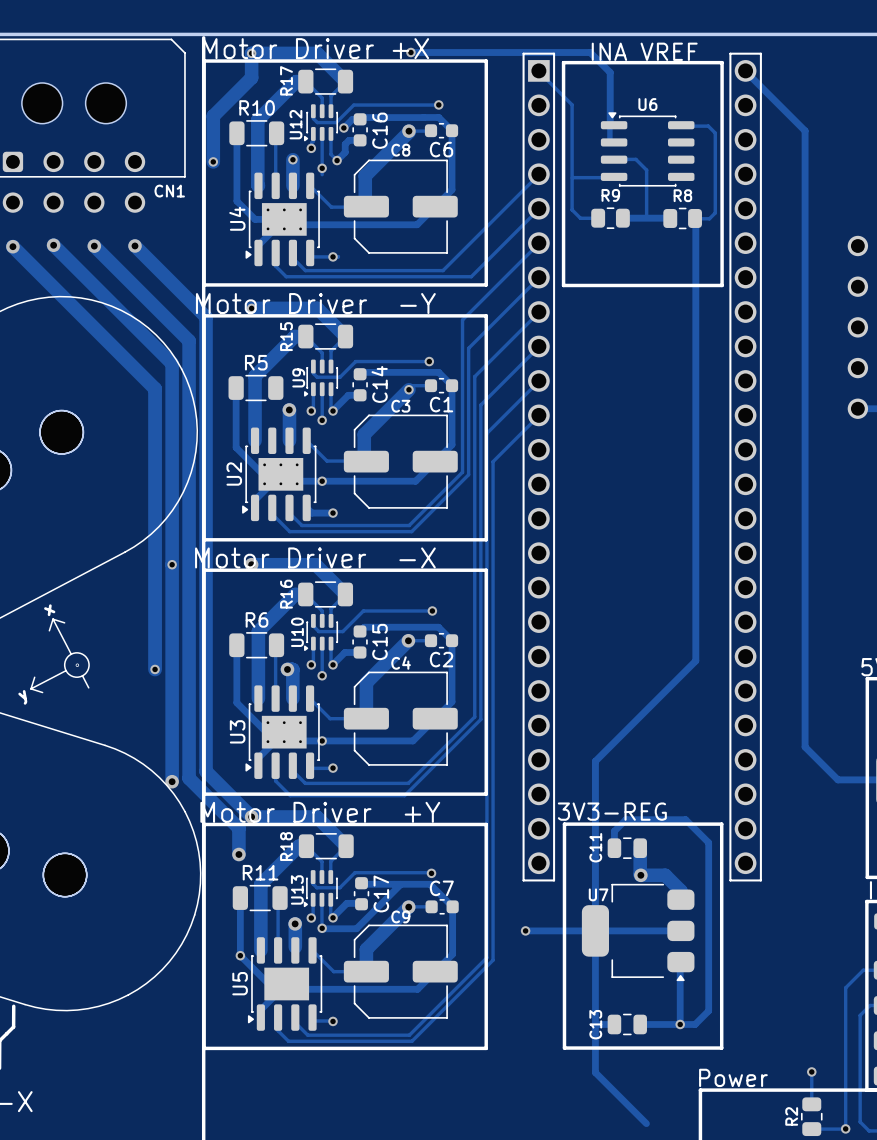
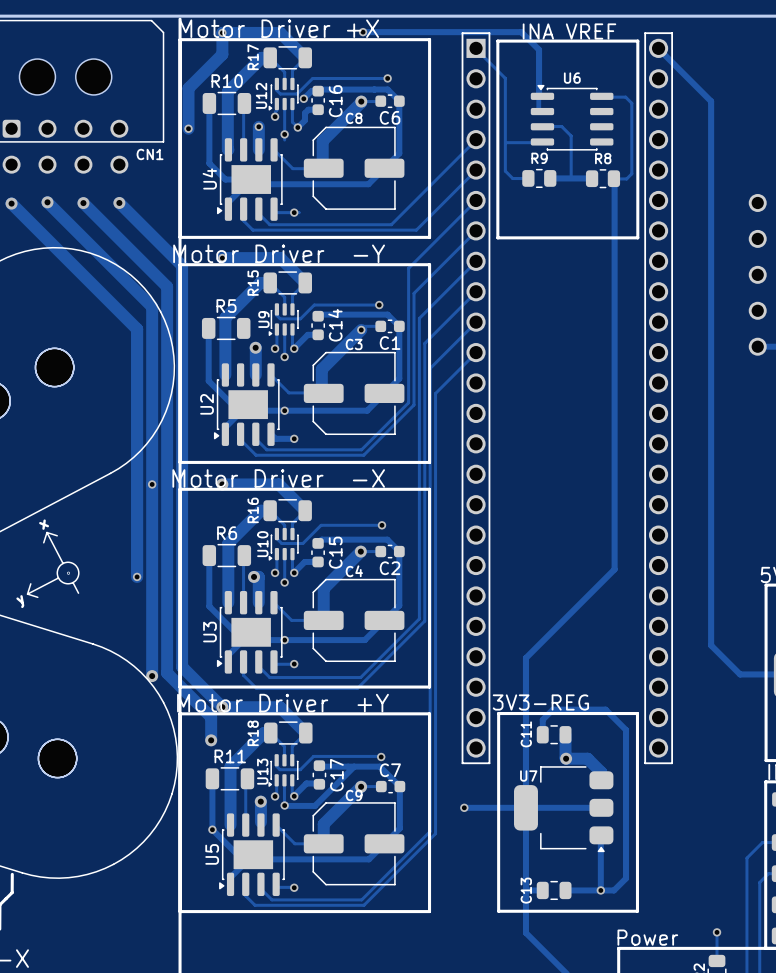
U4 footprint: [245, 172, 320, 267] -> [216, 138, 283, 221]
U2 footprint: [242, 427, 317, 522] -> [213, 363, 280, 446]
U3 footprint: [245, 685, 320, 779] -> [216, 591, 283, 674]

